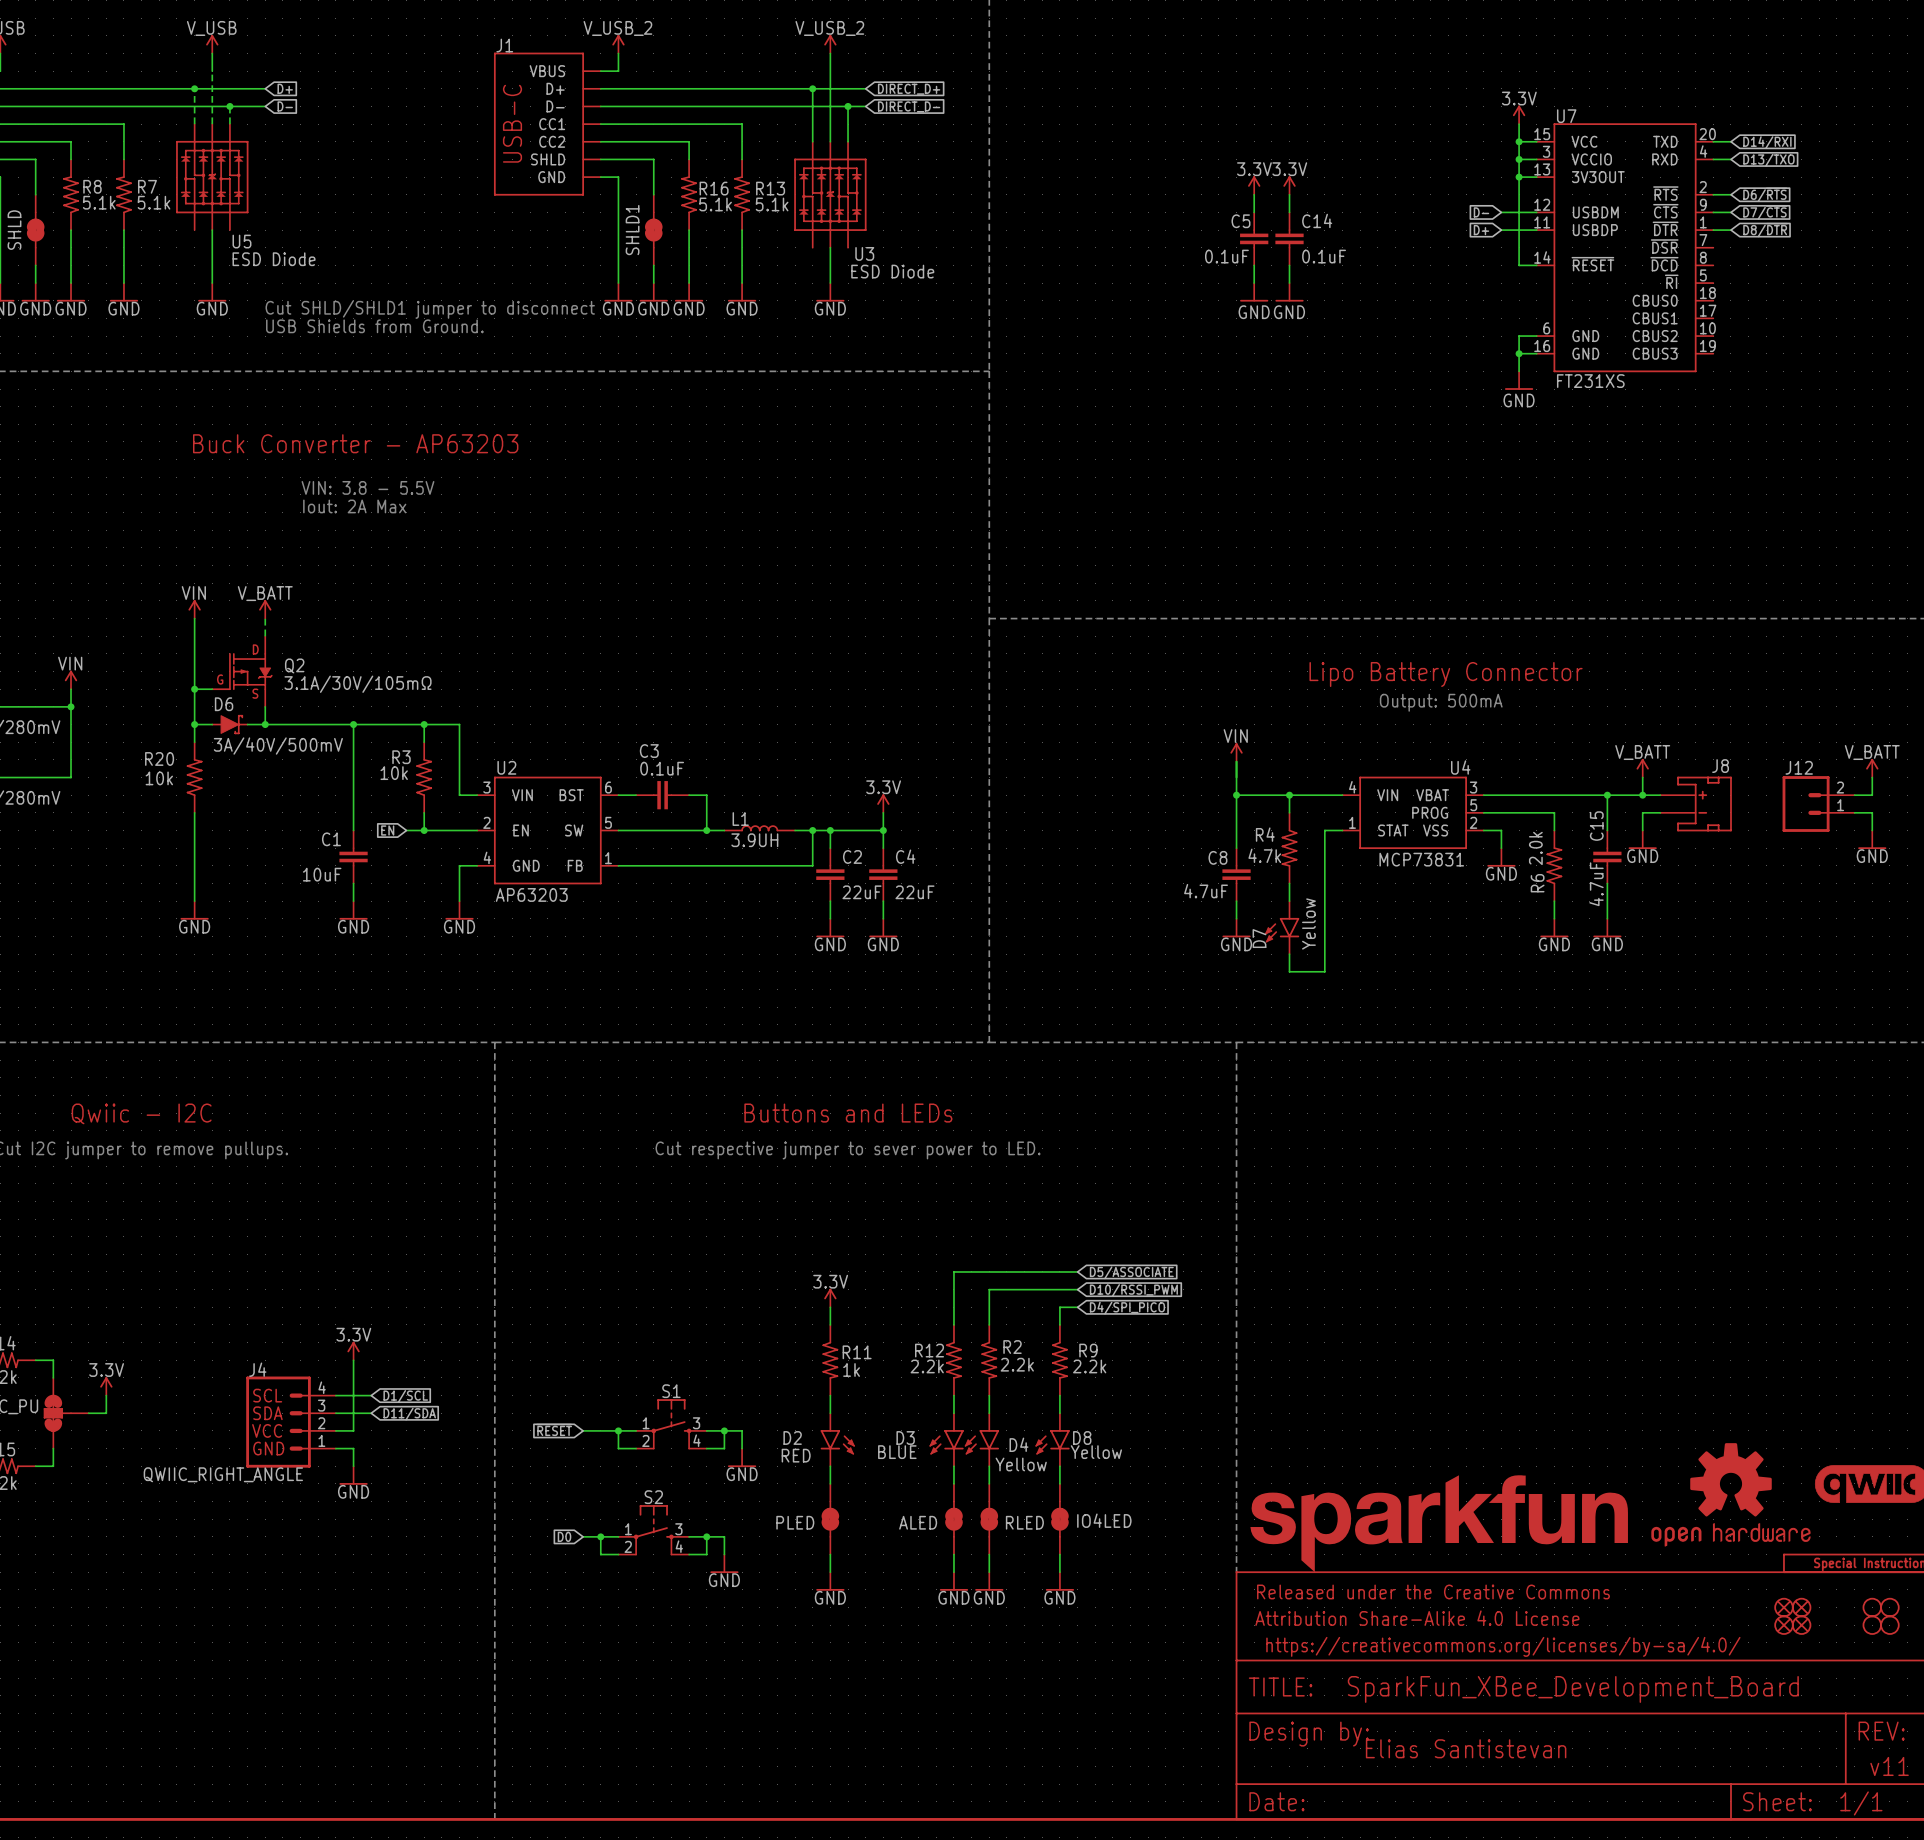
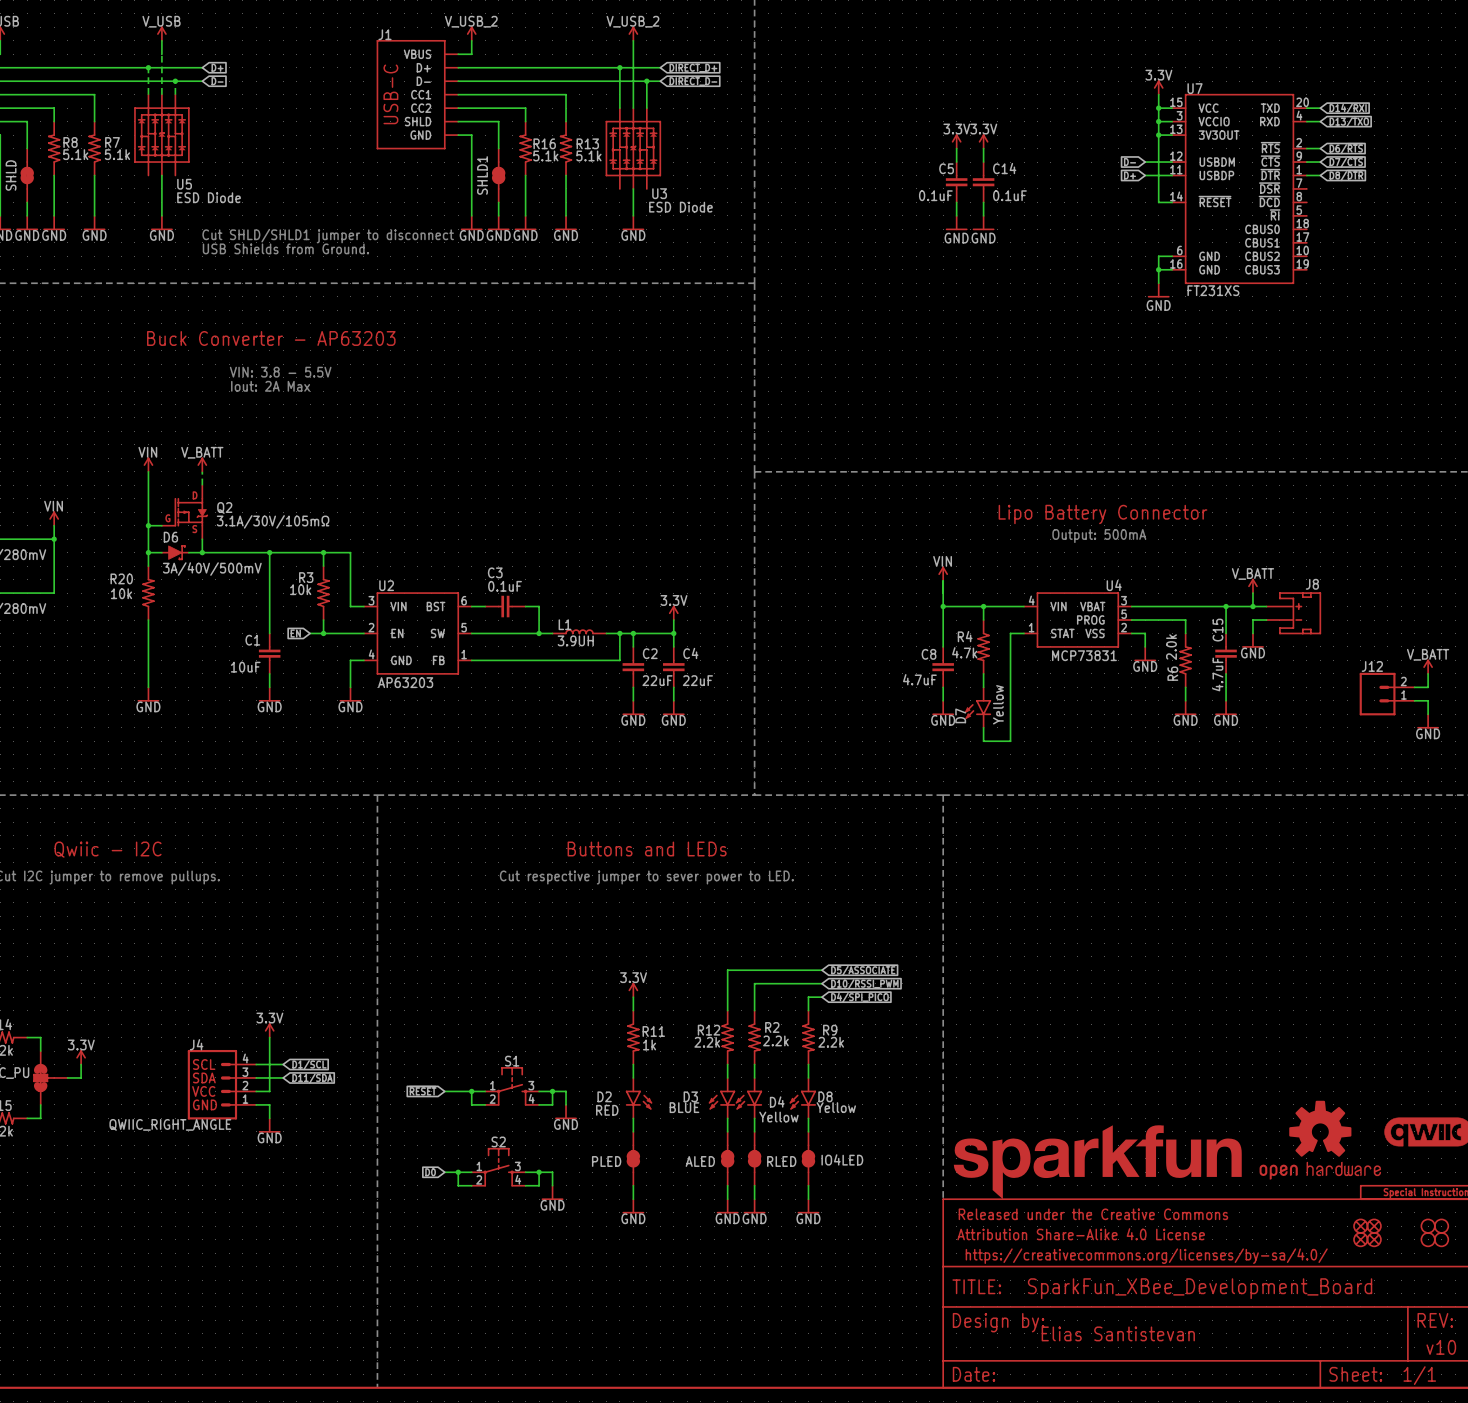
power symbol position: V_BATT (1872, 768) -> V_BATT (1428, 666)
wire: (1872, 777) (1872, 795) (1854, 795) -> (1428, 673) (1428, 687) (1414, 687)
J12 position: (1818, 804) -> (1387, 694)
wire: (1854, 812) (1872, 812) (1872, 830) -> (1414, 700) (1428, 700) (1428, 714)
power symbol position: GND (1872, 839) -> GND (1428, 721)
text: v11 (1889, 1766) -> v10 (1441, 1347)

